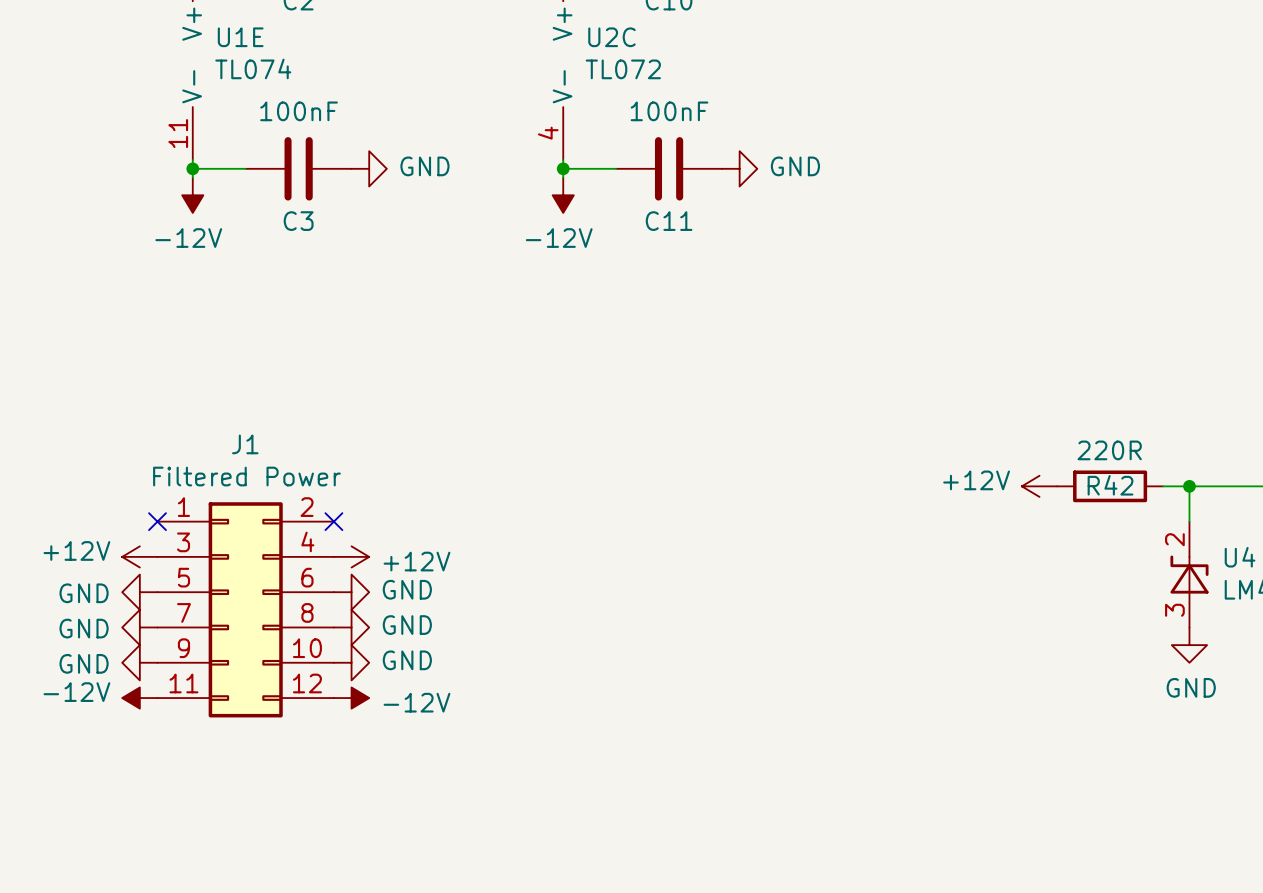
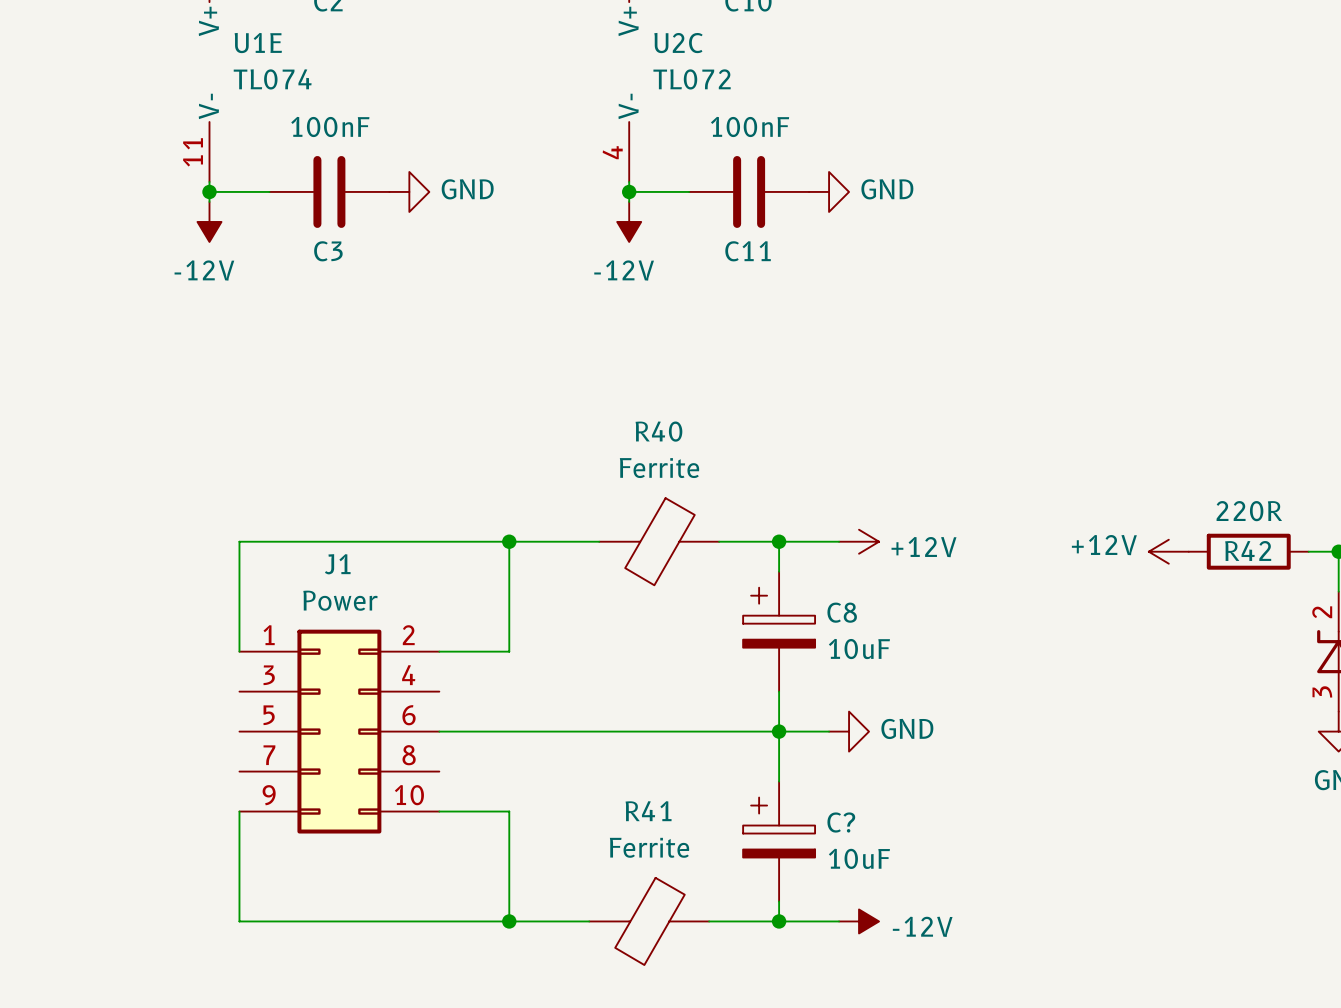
J1 value: Filtered Power (246, 476) -> Power (340, 600)
wire: none -> (509, 541) (509, 651) (439, 651)
junction: none -> (509, 541)
wire: none -> (599, 541) (239, 541) (239, 651)
R40: none -> Ferrite (659, 541)
wire: none -> (719, 541) (839, 541)
wire: none -> (779, 541) (779, 571)
junction: none -> (779, 541)
power symbol: none -> +12V (859, 541)
J1 symbol: [157, 502, 334, 718] -> [239, 629, 440, 834]
no-connect mark: (157, 521) -> none
no-connect mark: (333, 521) -> none
power symbol: +12V (139, 556) -> none
power symbol: +12V (351, 556) -> none
C8: none -> 10uF (779, 631)
power symbol: GND (139, 592) -> none
power symbol: GND (351, 592) -> none
wire: none -> (779, 691) (779, 781)
power symbol: GND (139, 627) -> none
power symbol: GND (351, 627) -> none
wire: none -> (439, 731) (829, 731)
junction: none -> (779, 731)
power symbol: none -> GND (849, 731)
power symbol: GND (139, 662) -> none
power symbol: GND (351, 662) -> none
power symbol: -12V (139, 698) -> none
power symbol: -12V (351, 698) -> none
wire: none -> (239, 811) (239, 921) (589, 921)
wire: none -> (439, 811) (509, 811) (509, 921)
C?: none -> 10uF (779, 841)
wire: none -> (779, 901) (779, 921)
junction: none -> (509, 921)
R41: none -> Ferrite (649, 921)
wire: none -> (709, 921) (839, 921)
junction: none -> (779, 921)
power symbol: none -> -12V (859, 921)

